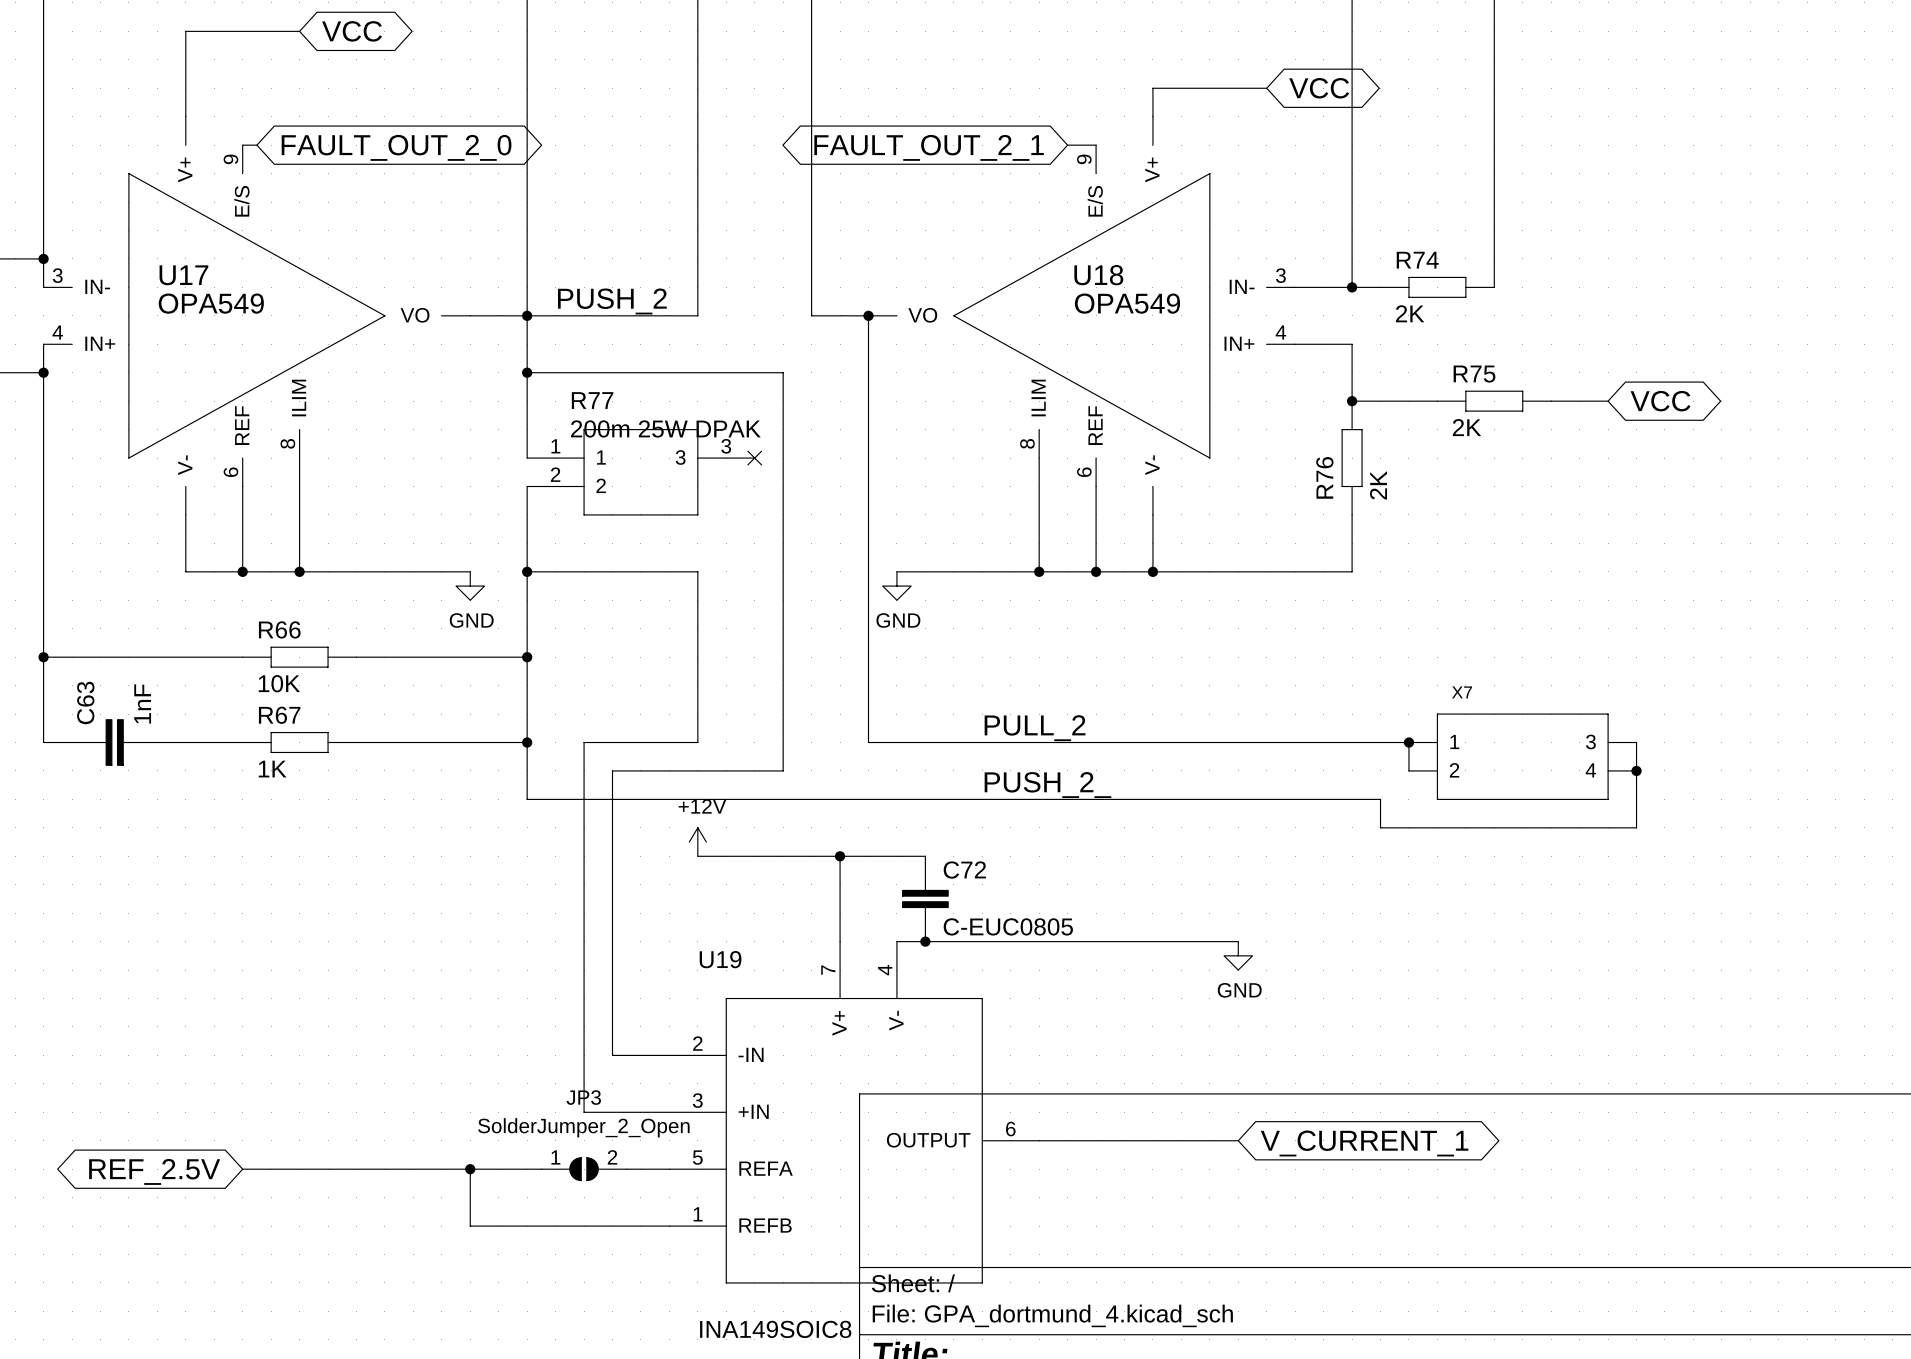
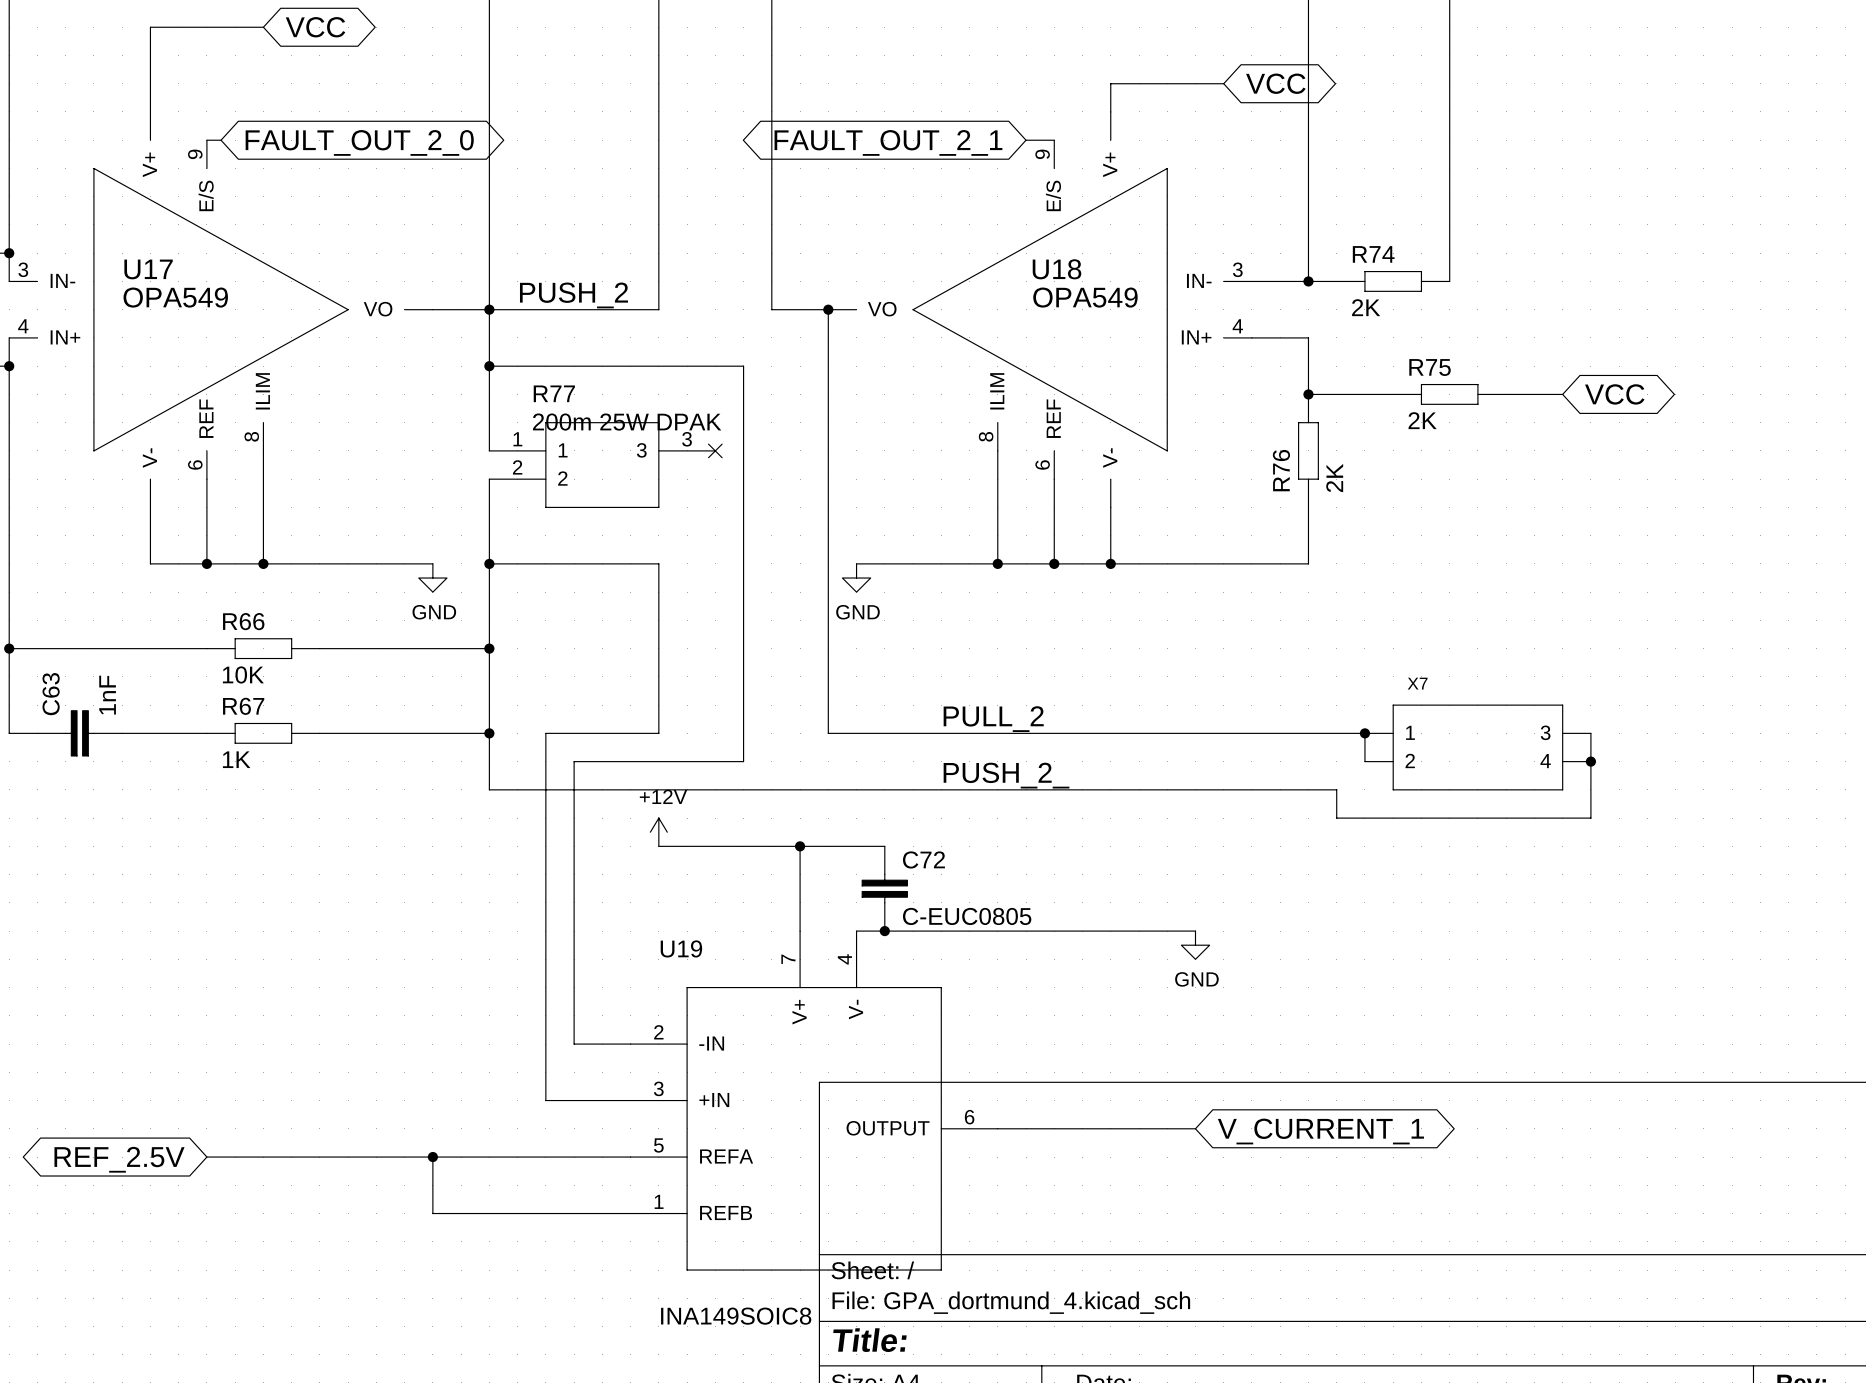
JP3: SolderJumper_2_Open (584, 1169) -> none

